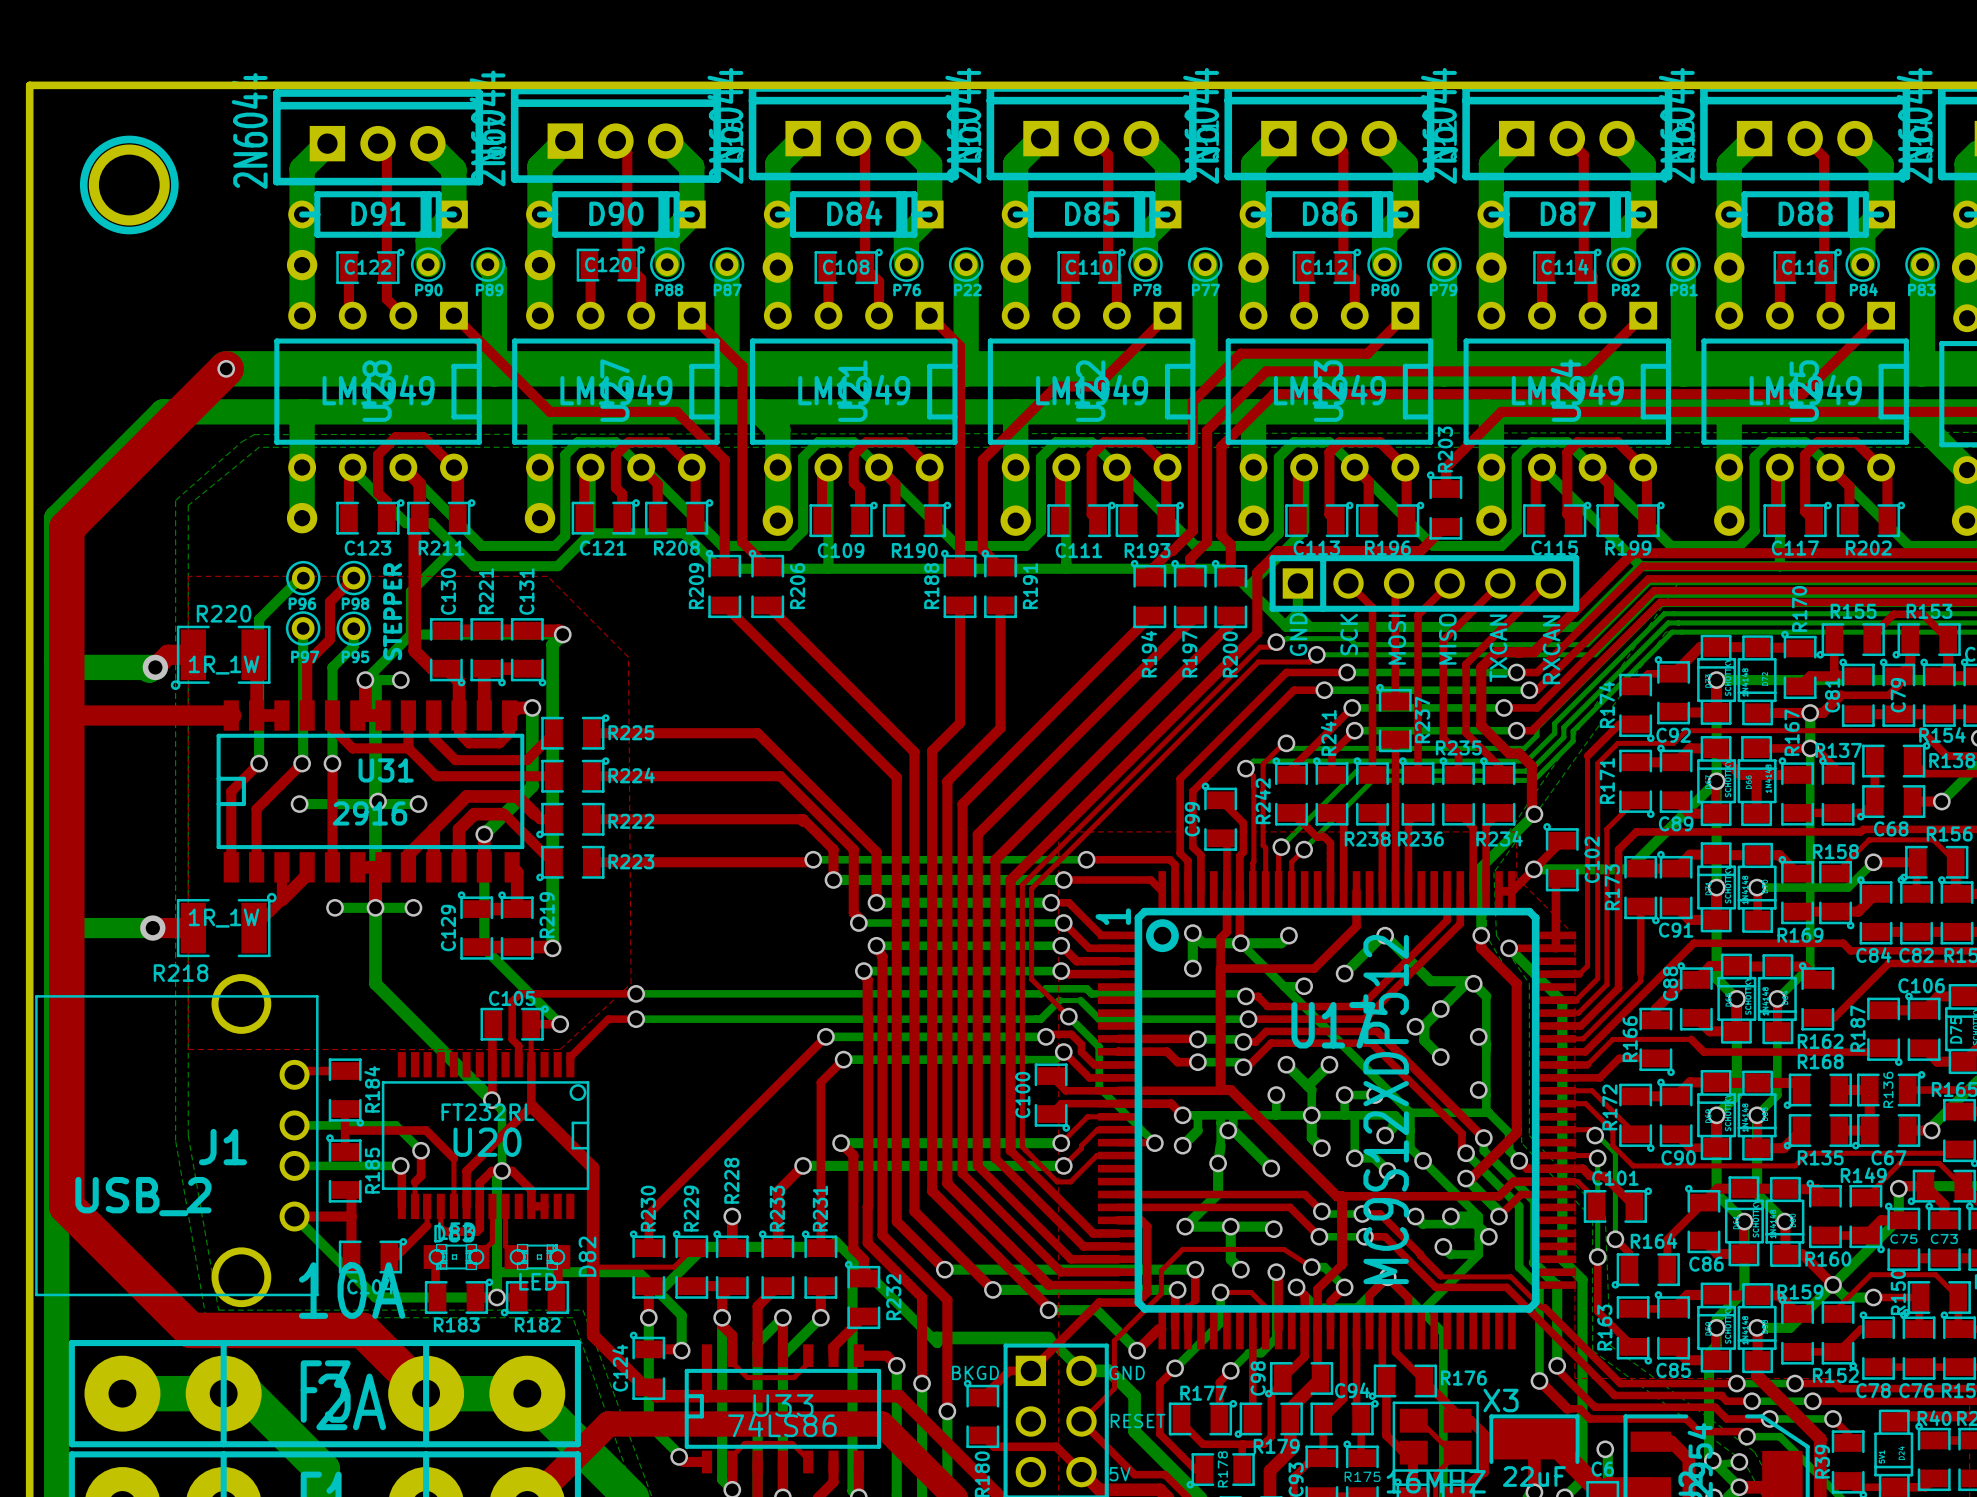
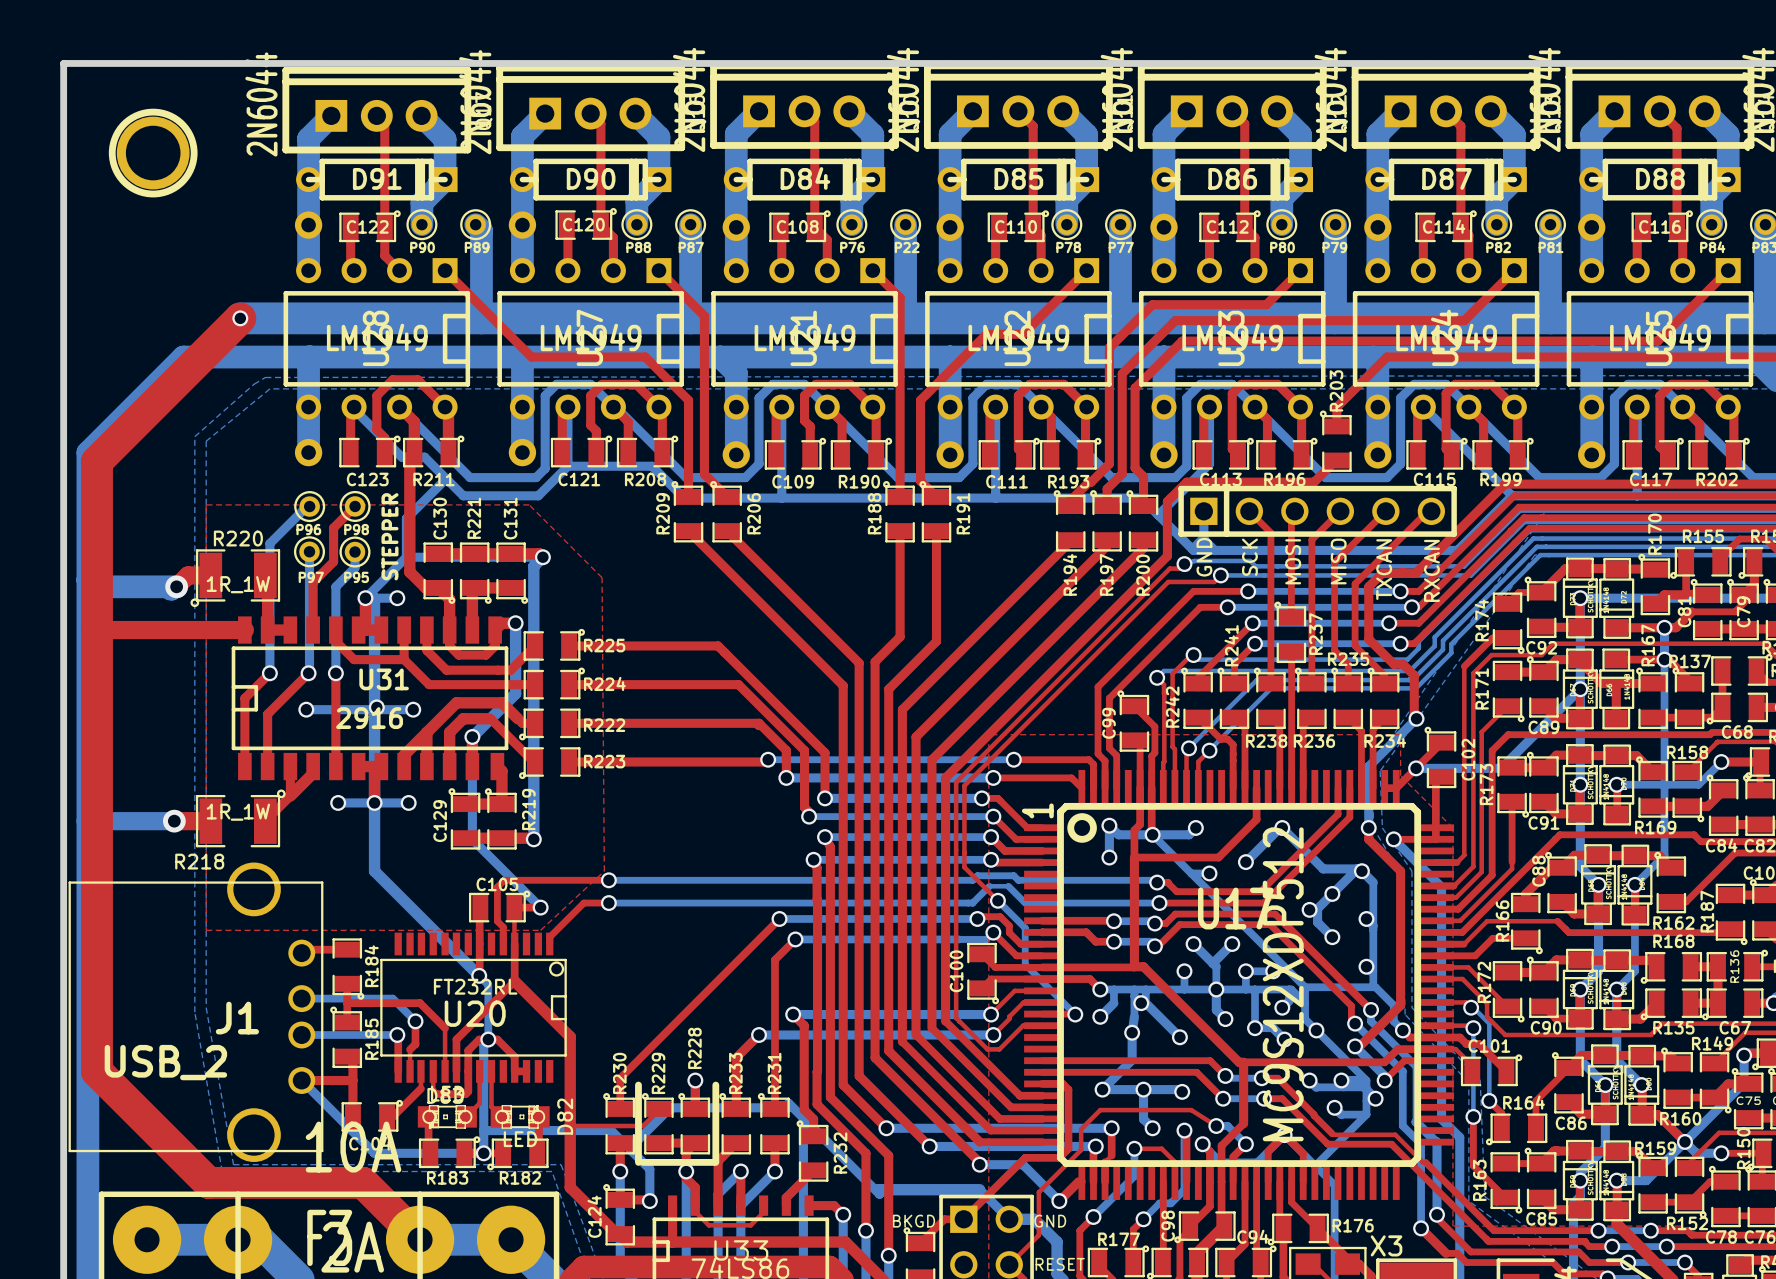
line: none -> (638, 1085) (638, 1162)
line: none -> (715, 1085) (715, 1162)
line: none -> (643, 1162) (713, 1162)

